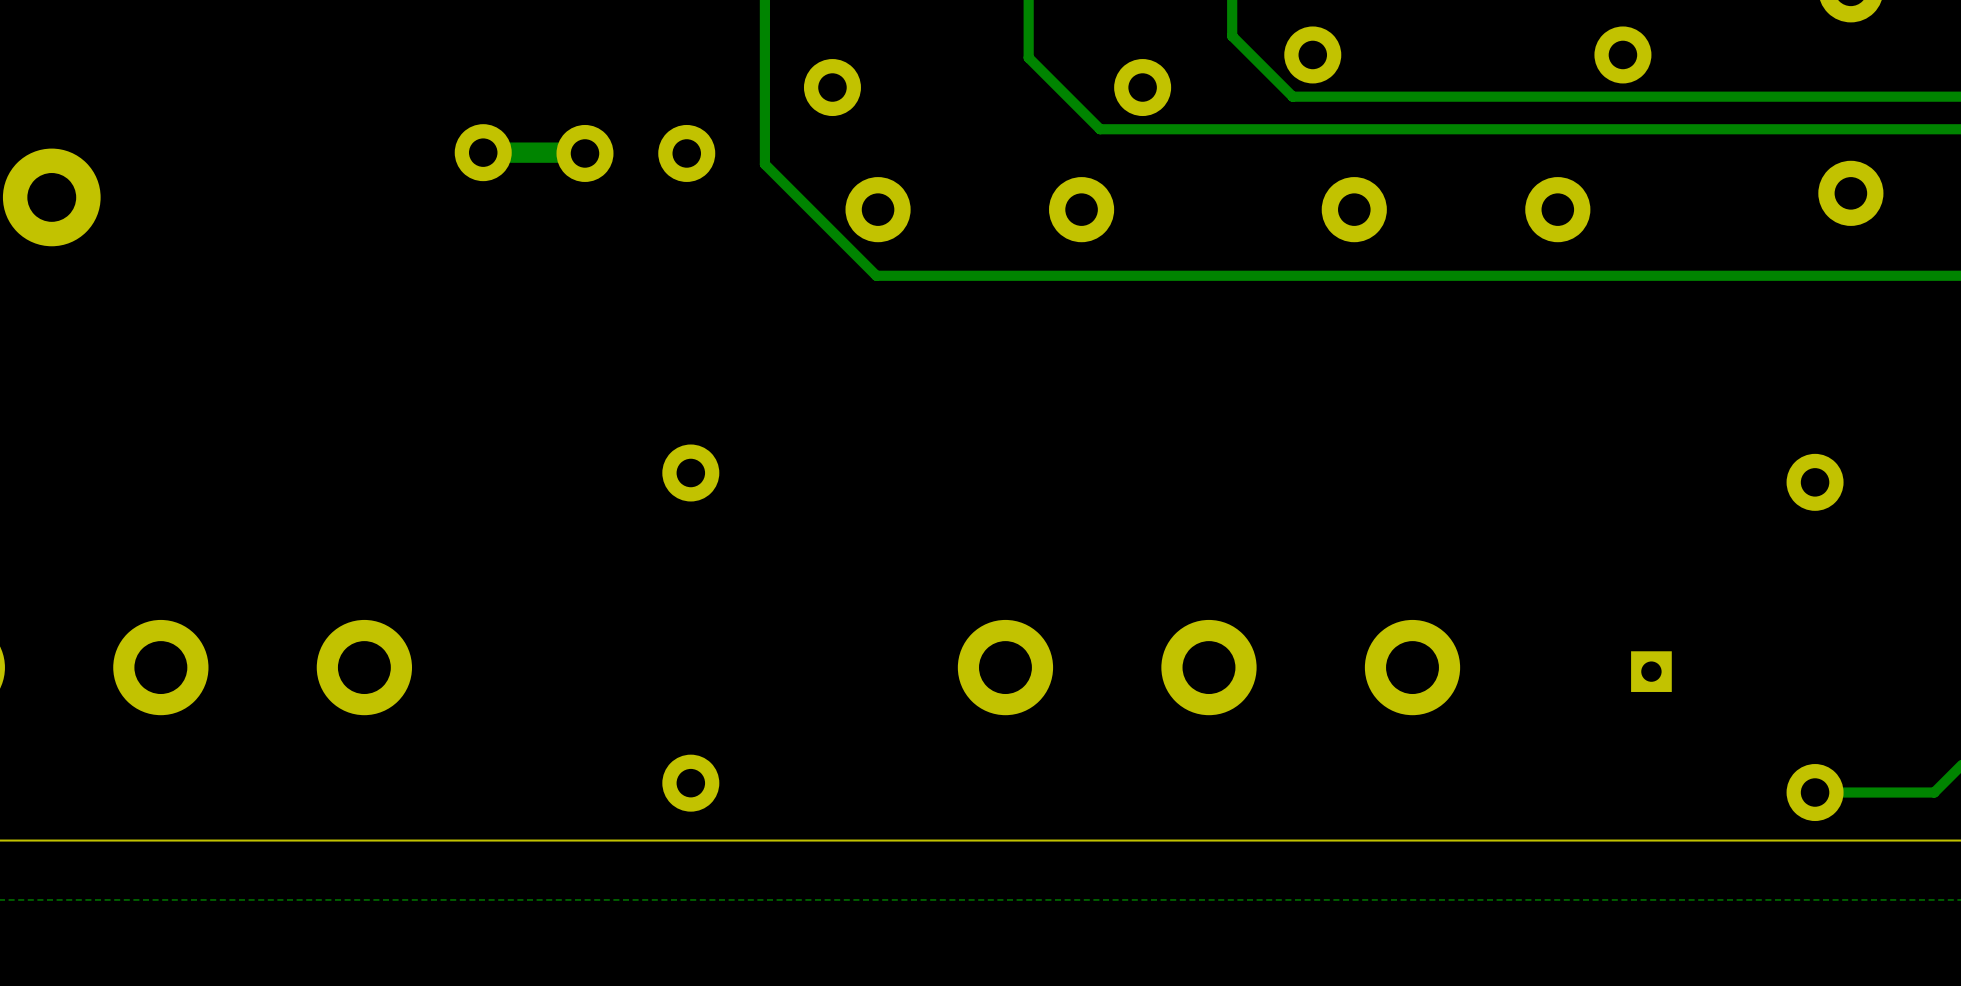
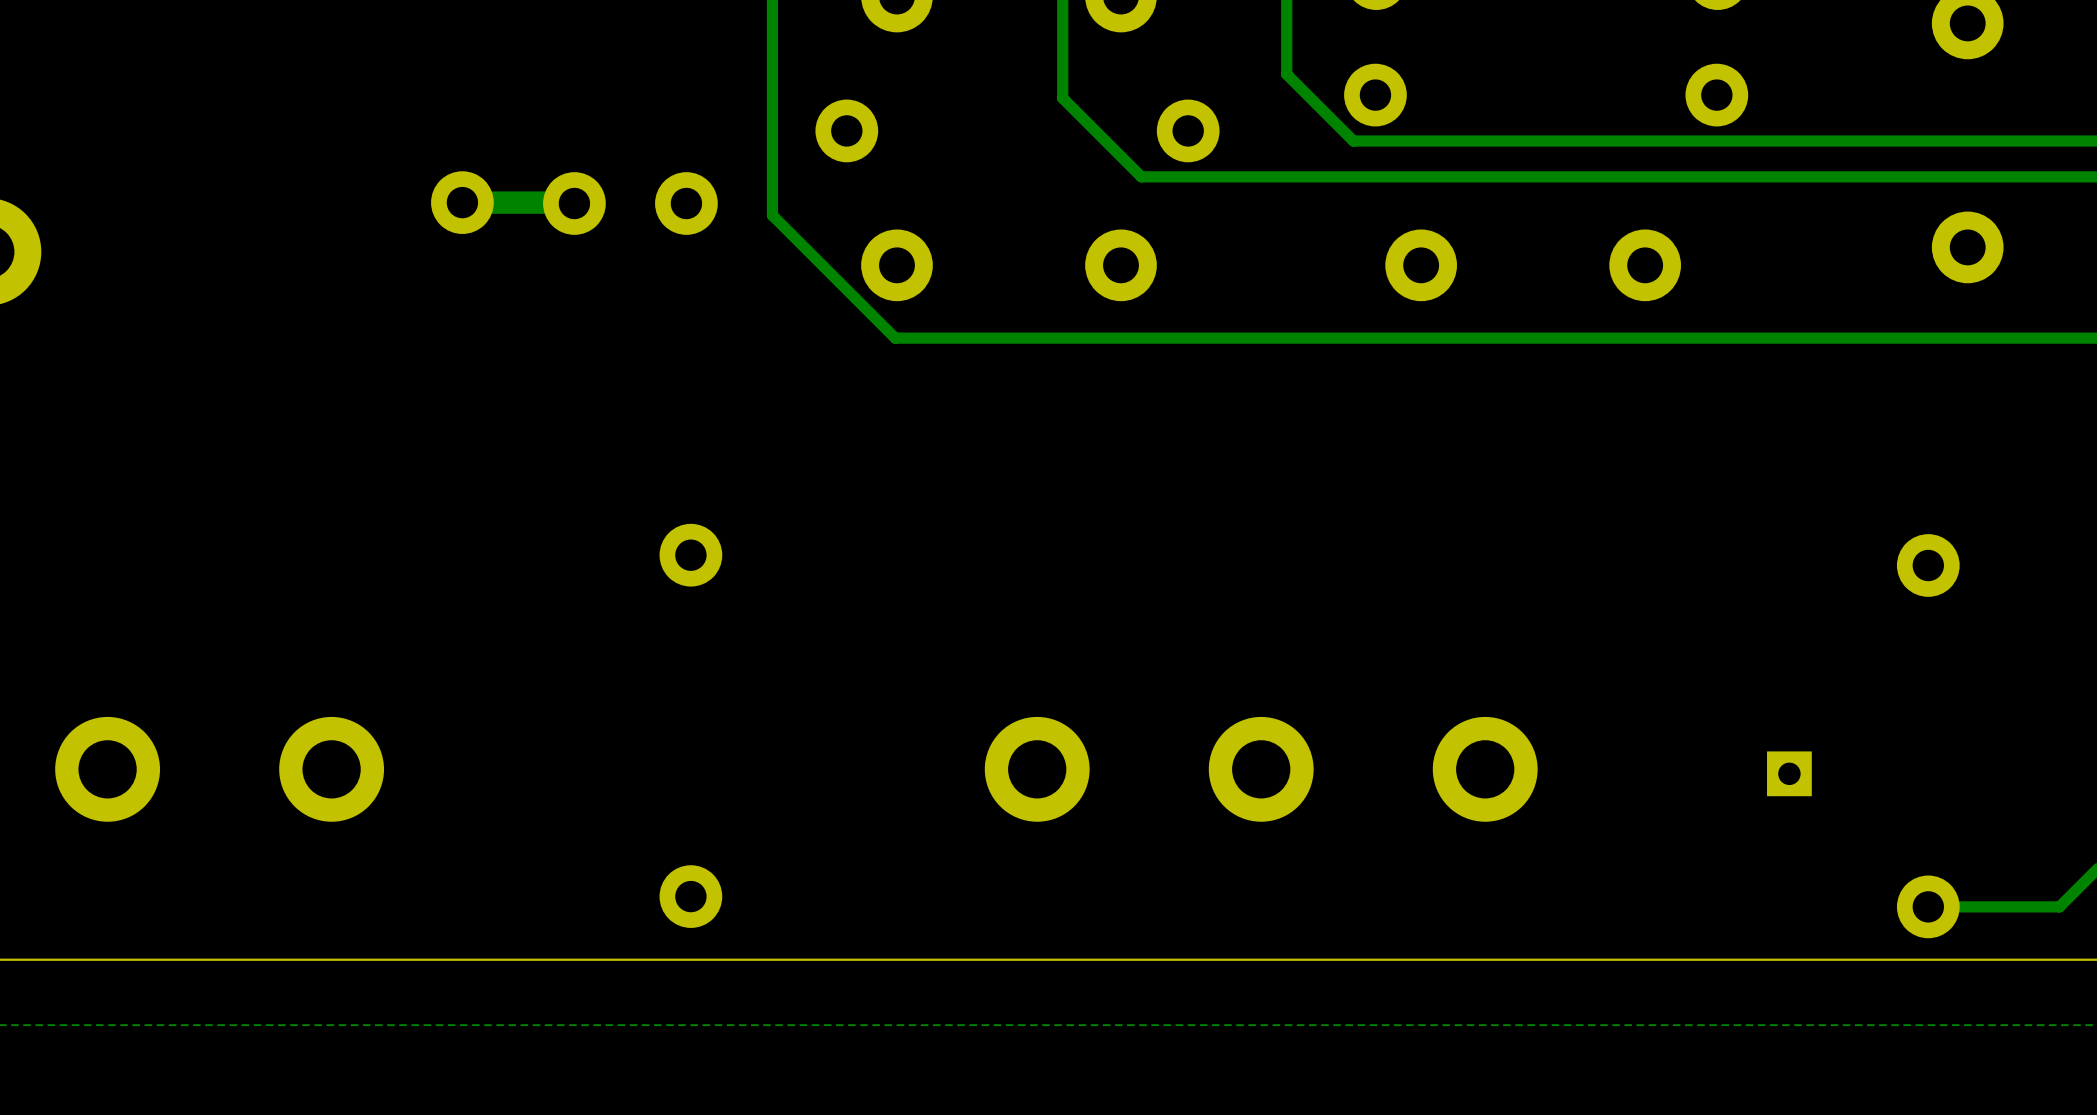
part position: (1651, 671) -> (1789, 773)

